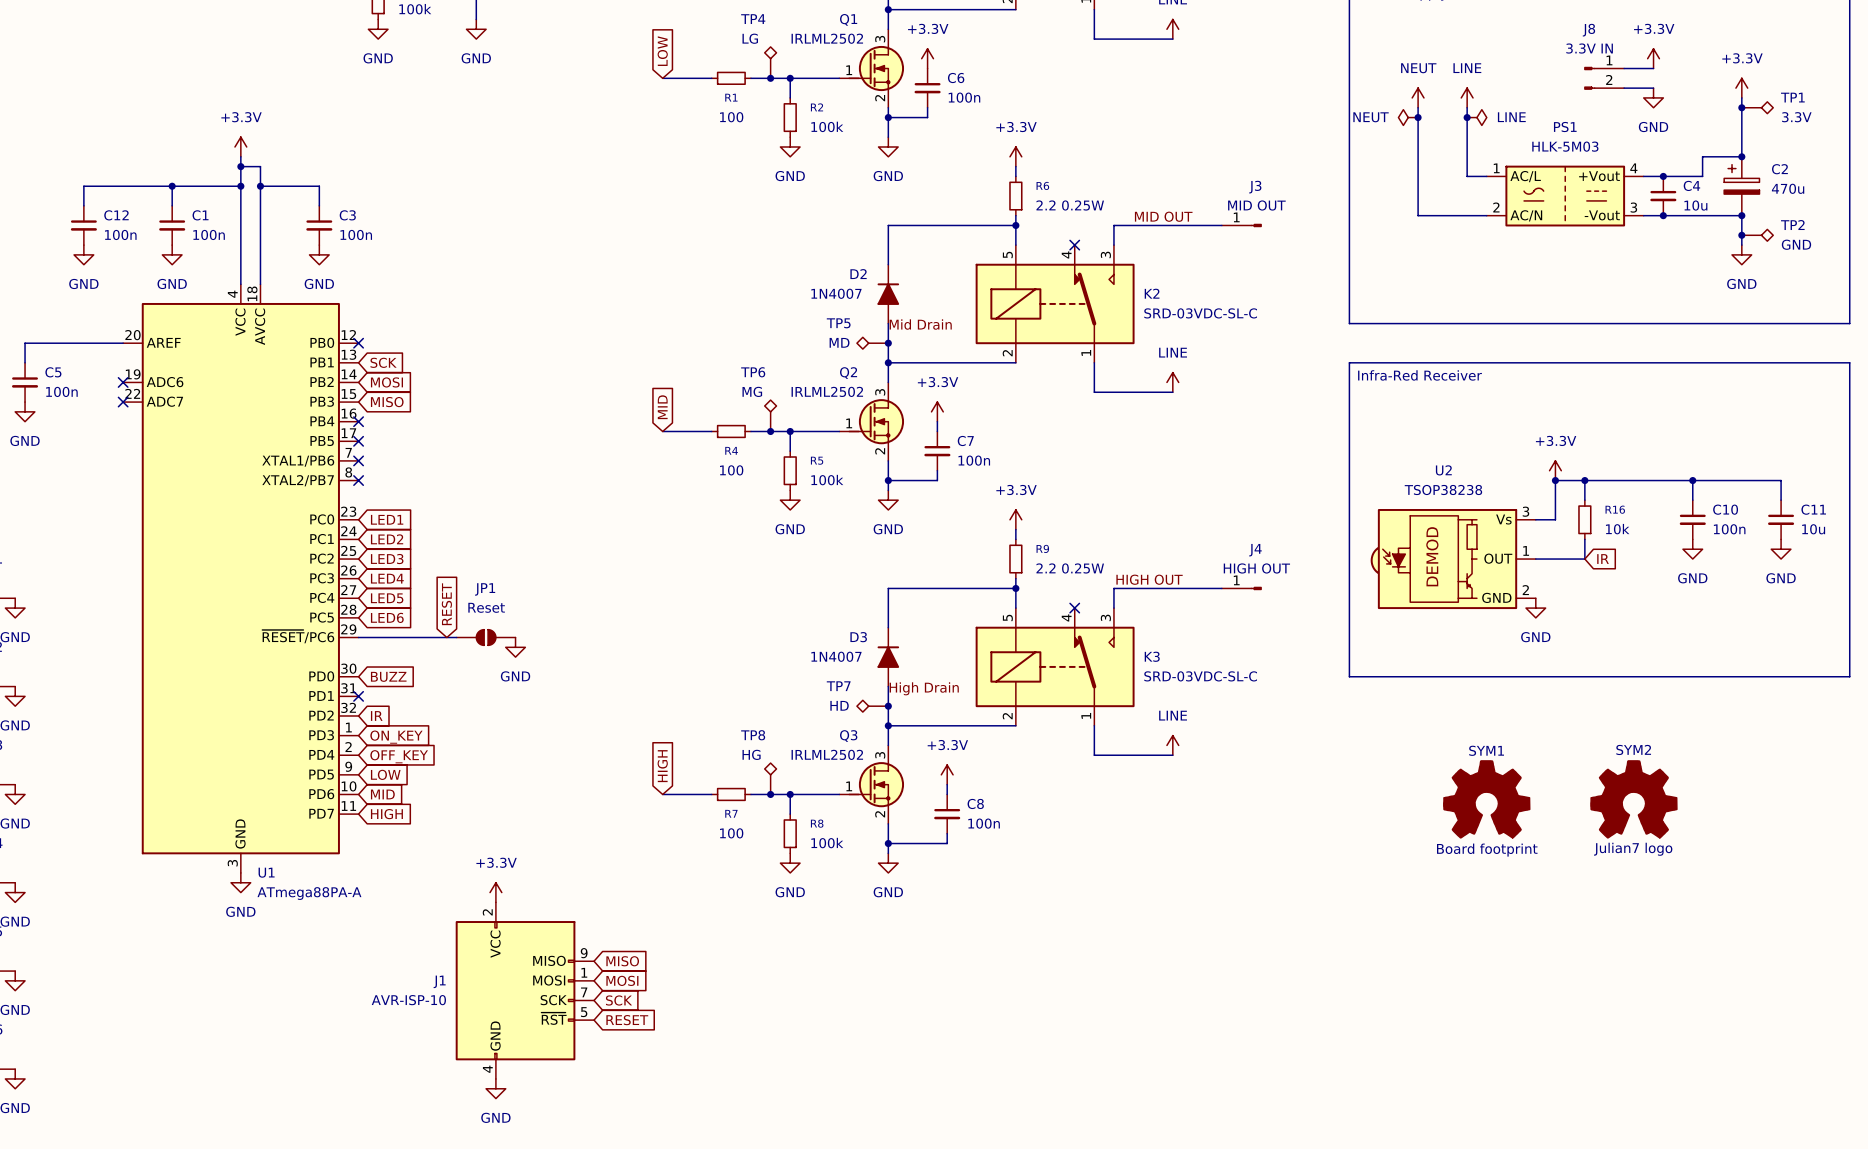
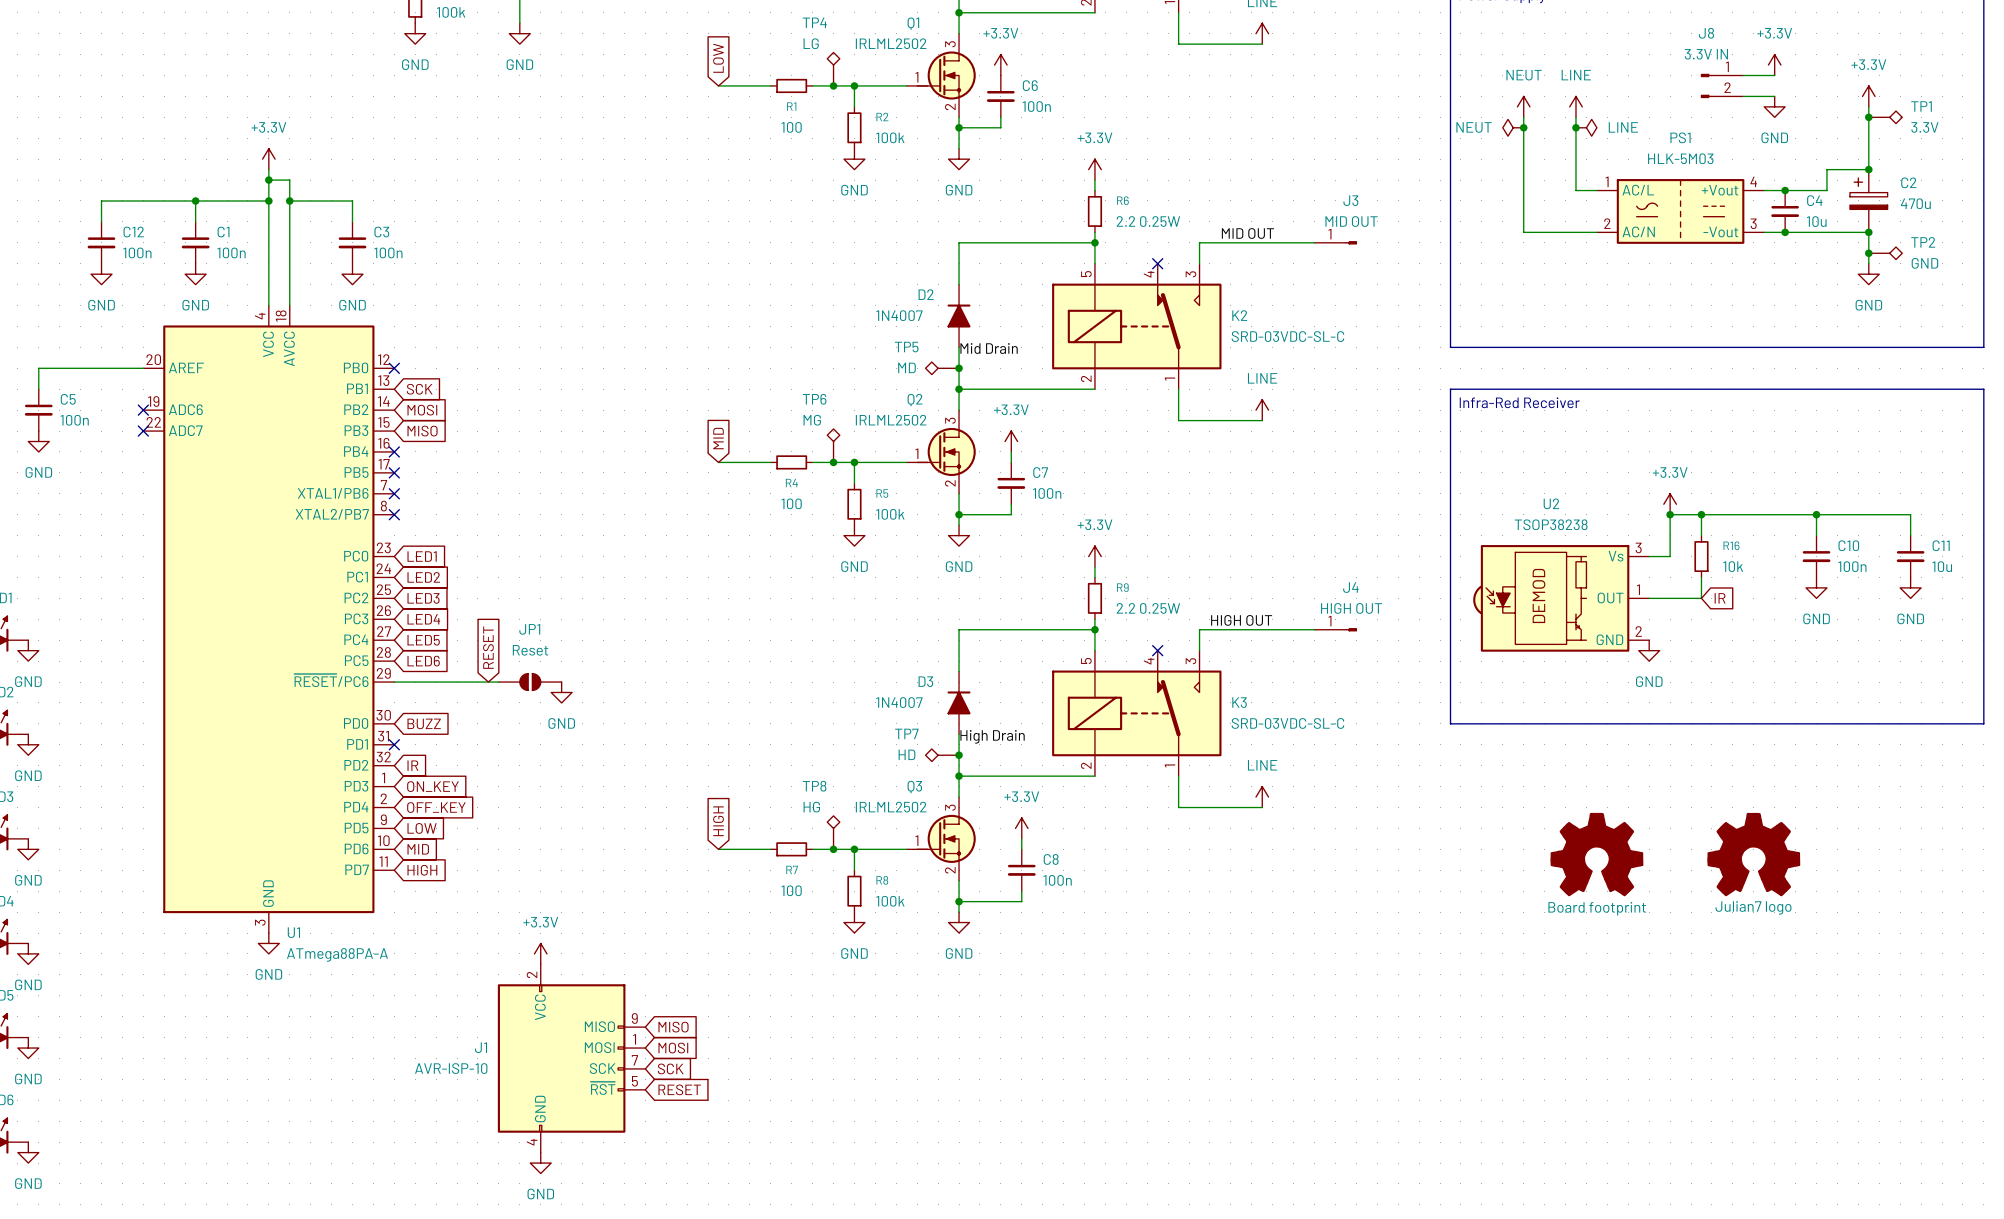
SYM2 name: SYM2 (1633, 749) -> none
SYM1 name: SYM1 (1486, 750) -> none

